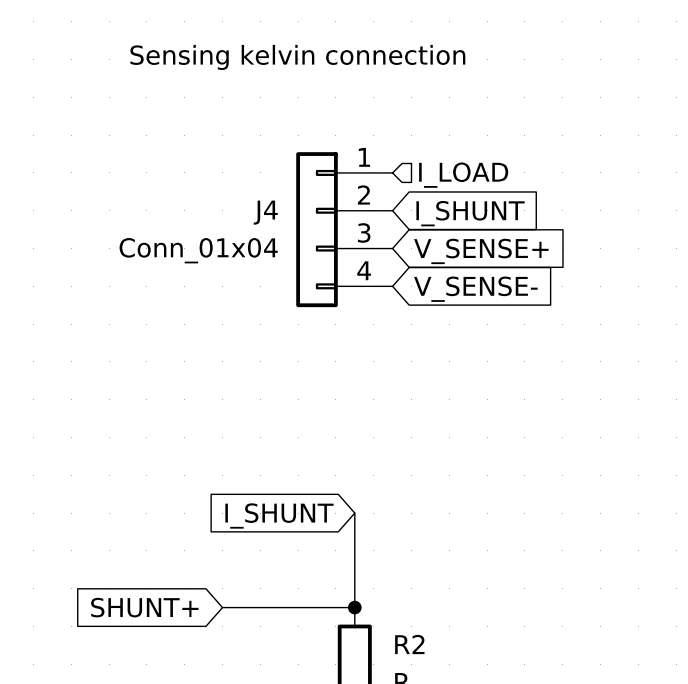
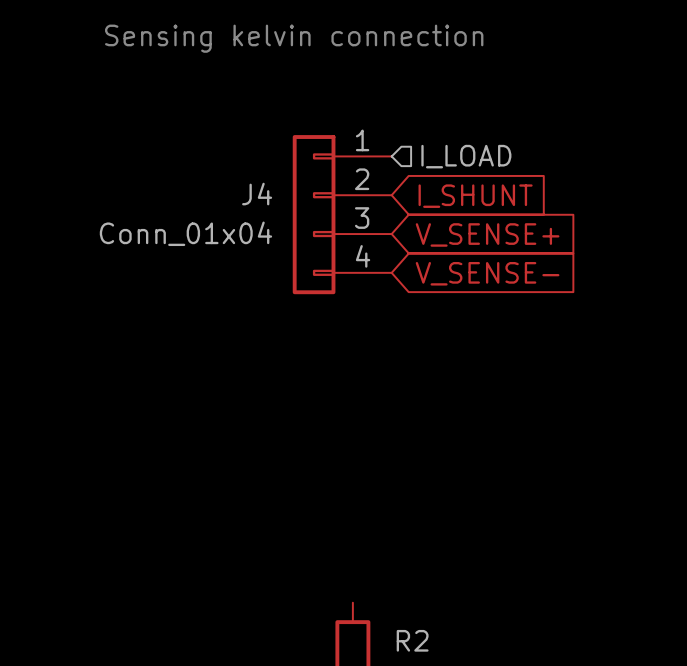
wire: (354, 513) (354, 607) (222, 607) -> none
global label: I_SHUNT (279, 515) -> none
global label: SHUNT+ (144, 607) -> none
junction: (354, 607) -> none

